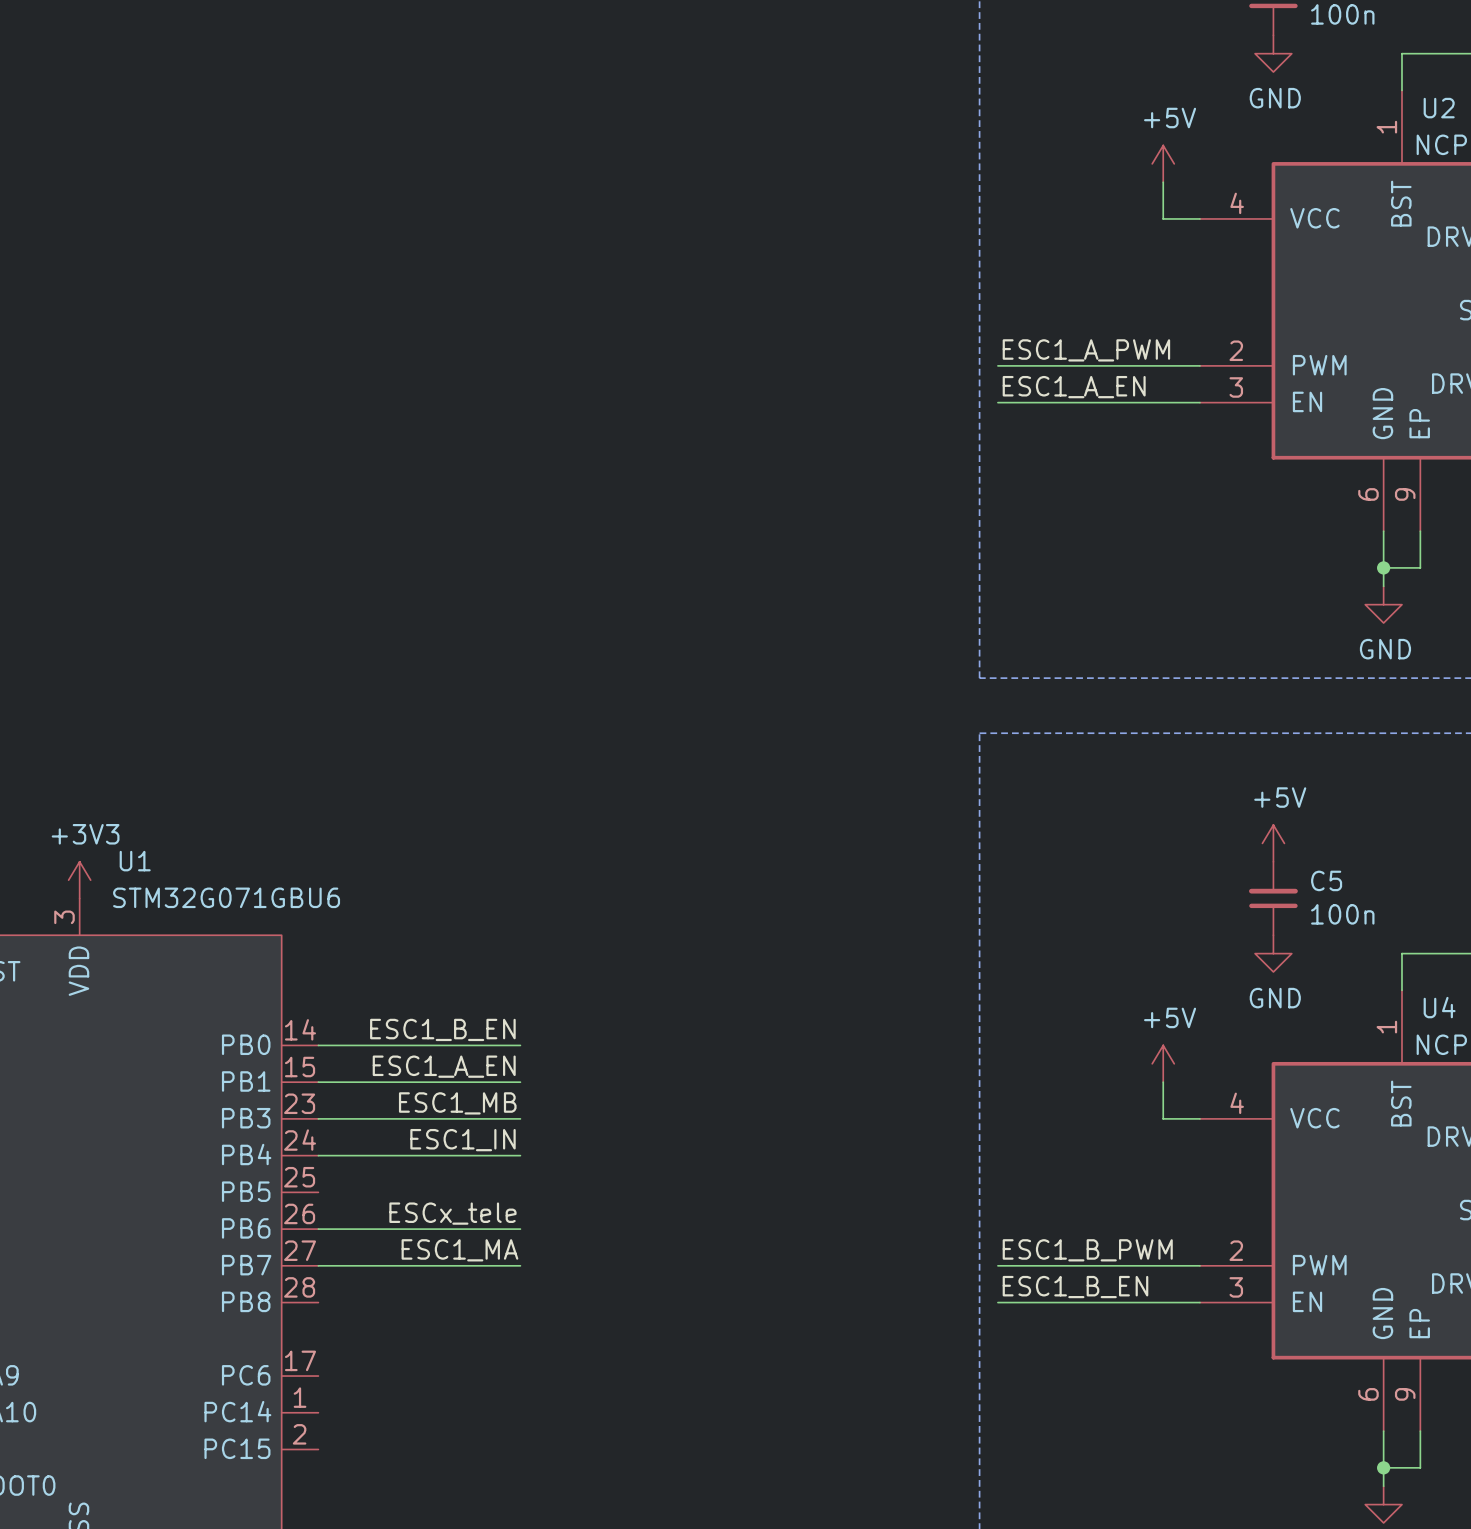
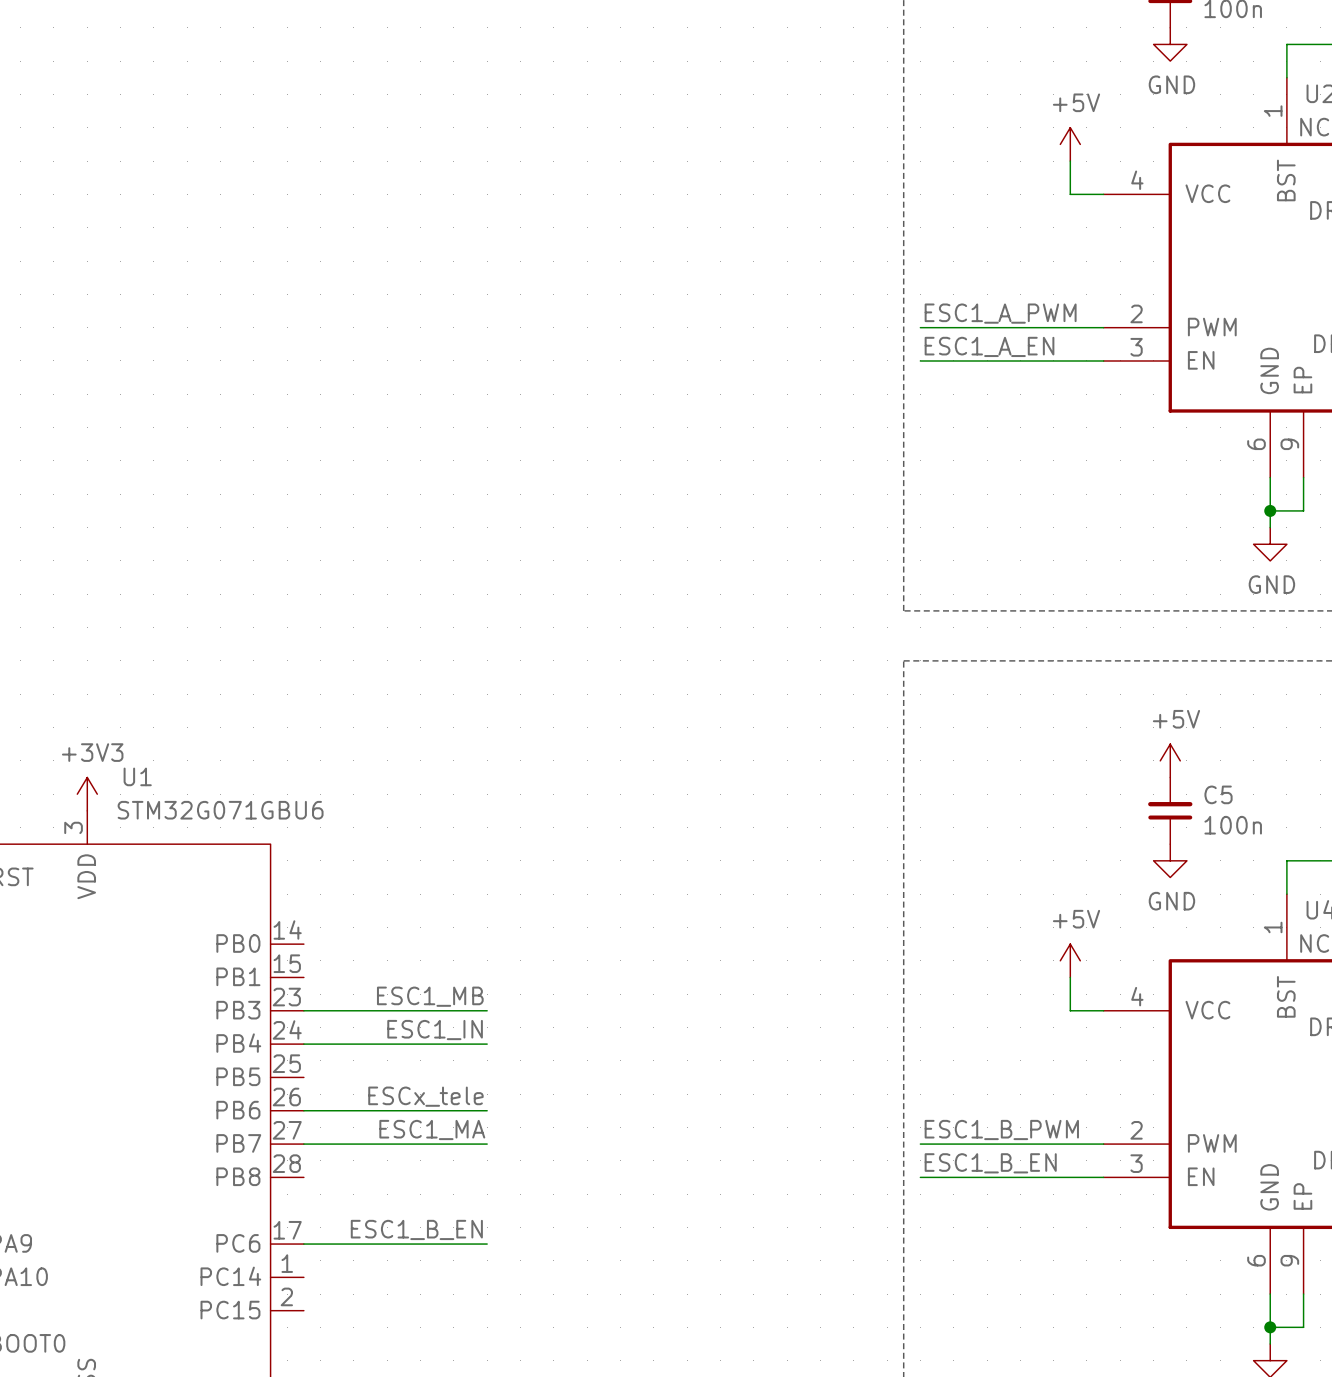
label position: ESC1_B_EN (442, 1029) -> ESC1_B_EN (416, 1229)
wire: (318, 1045) (520, 1045) -> none
label: ESC1_A_EN (444, 1066) -> none
wire: (318, 1082) (520, 1082) -> (303, 1244) (487, 1244)

